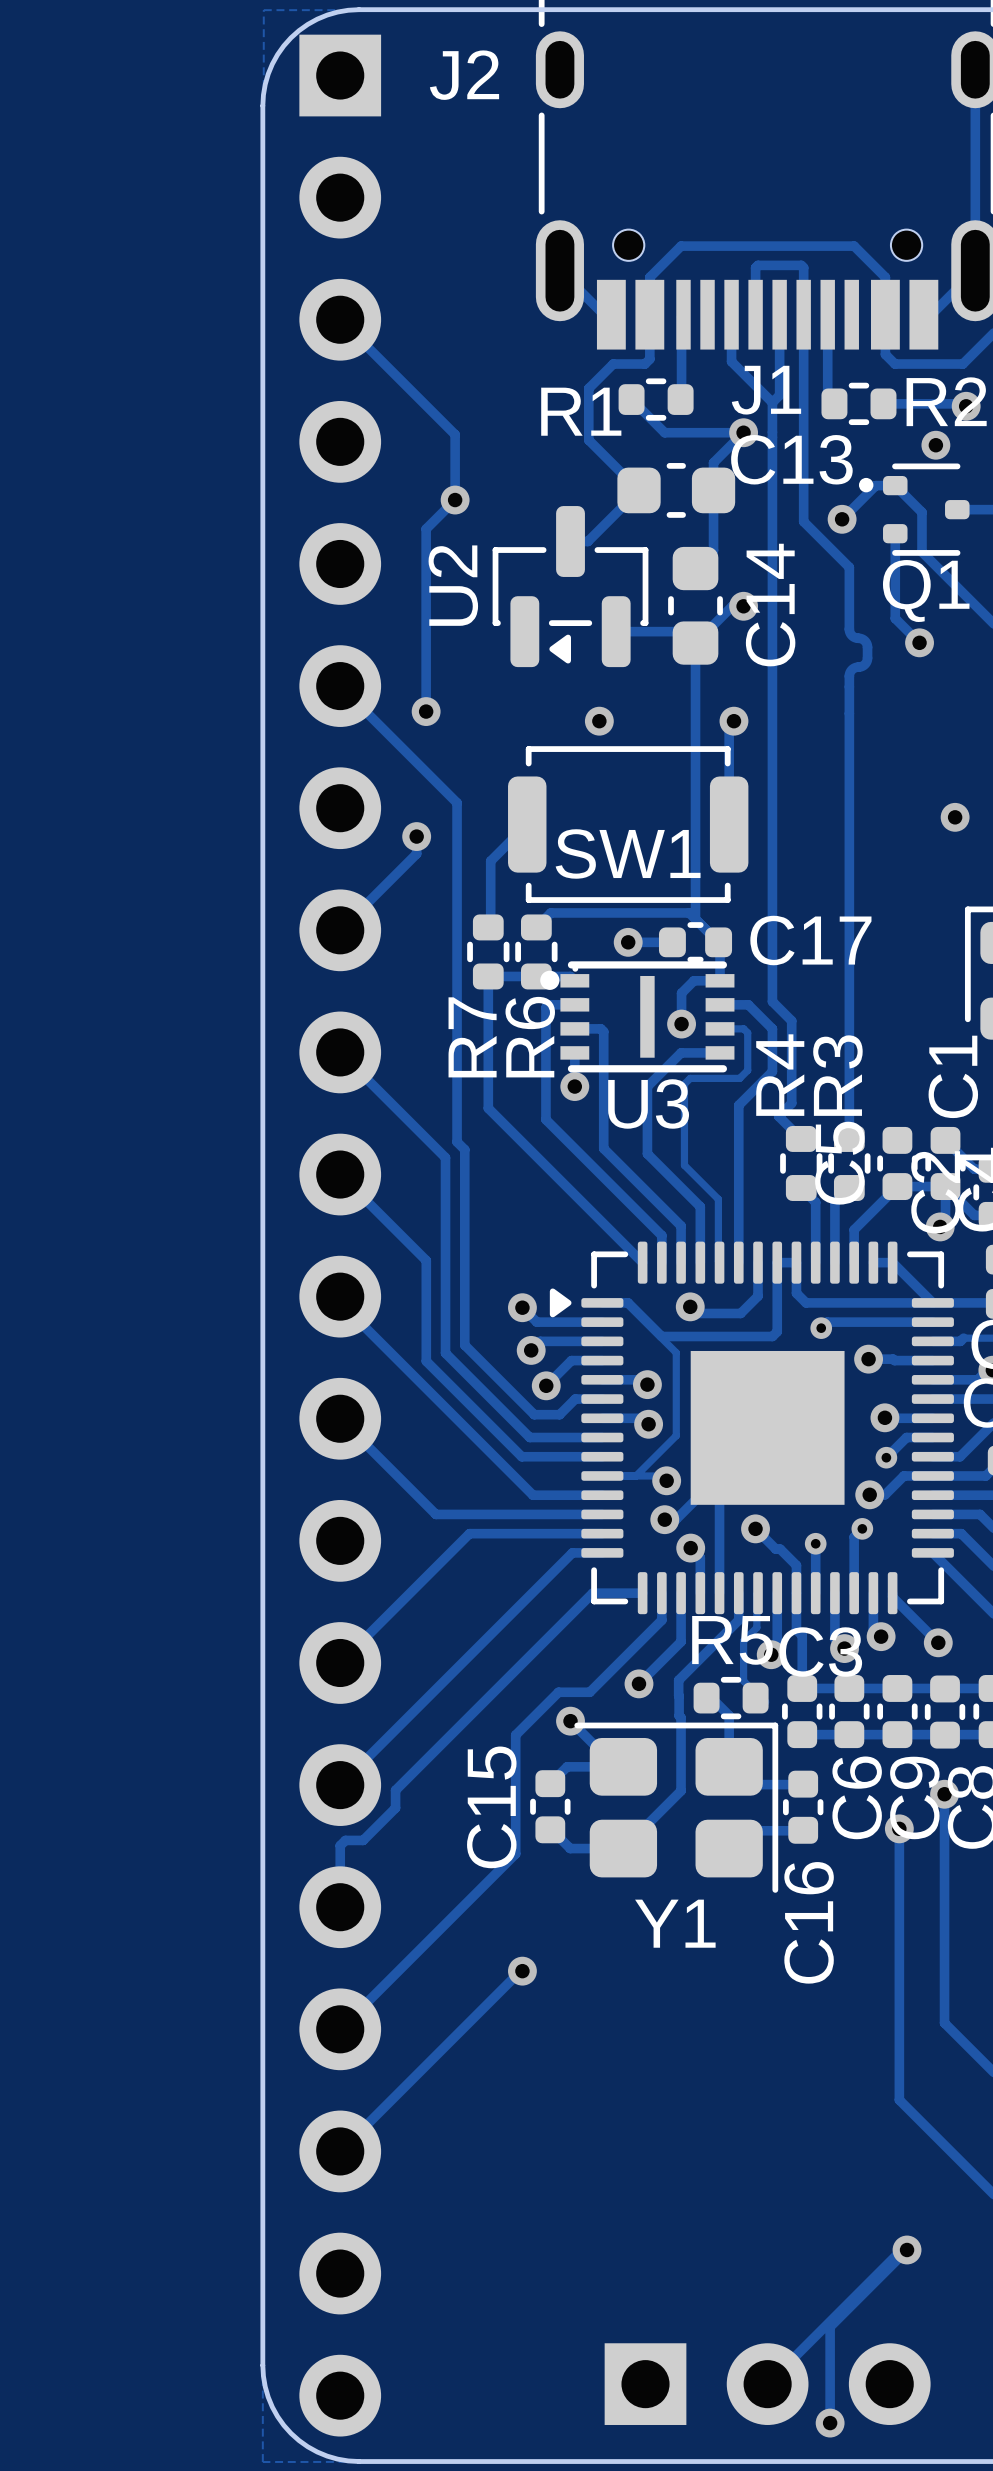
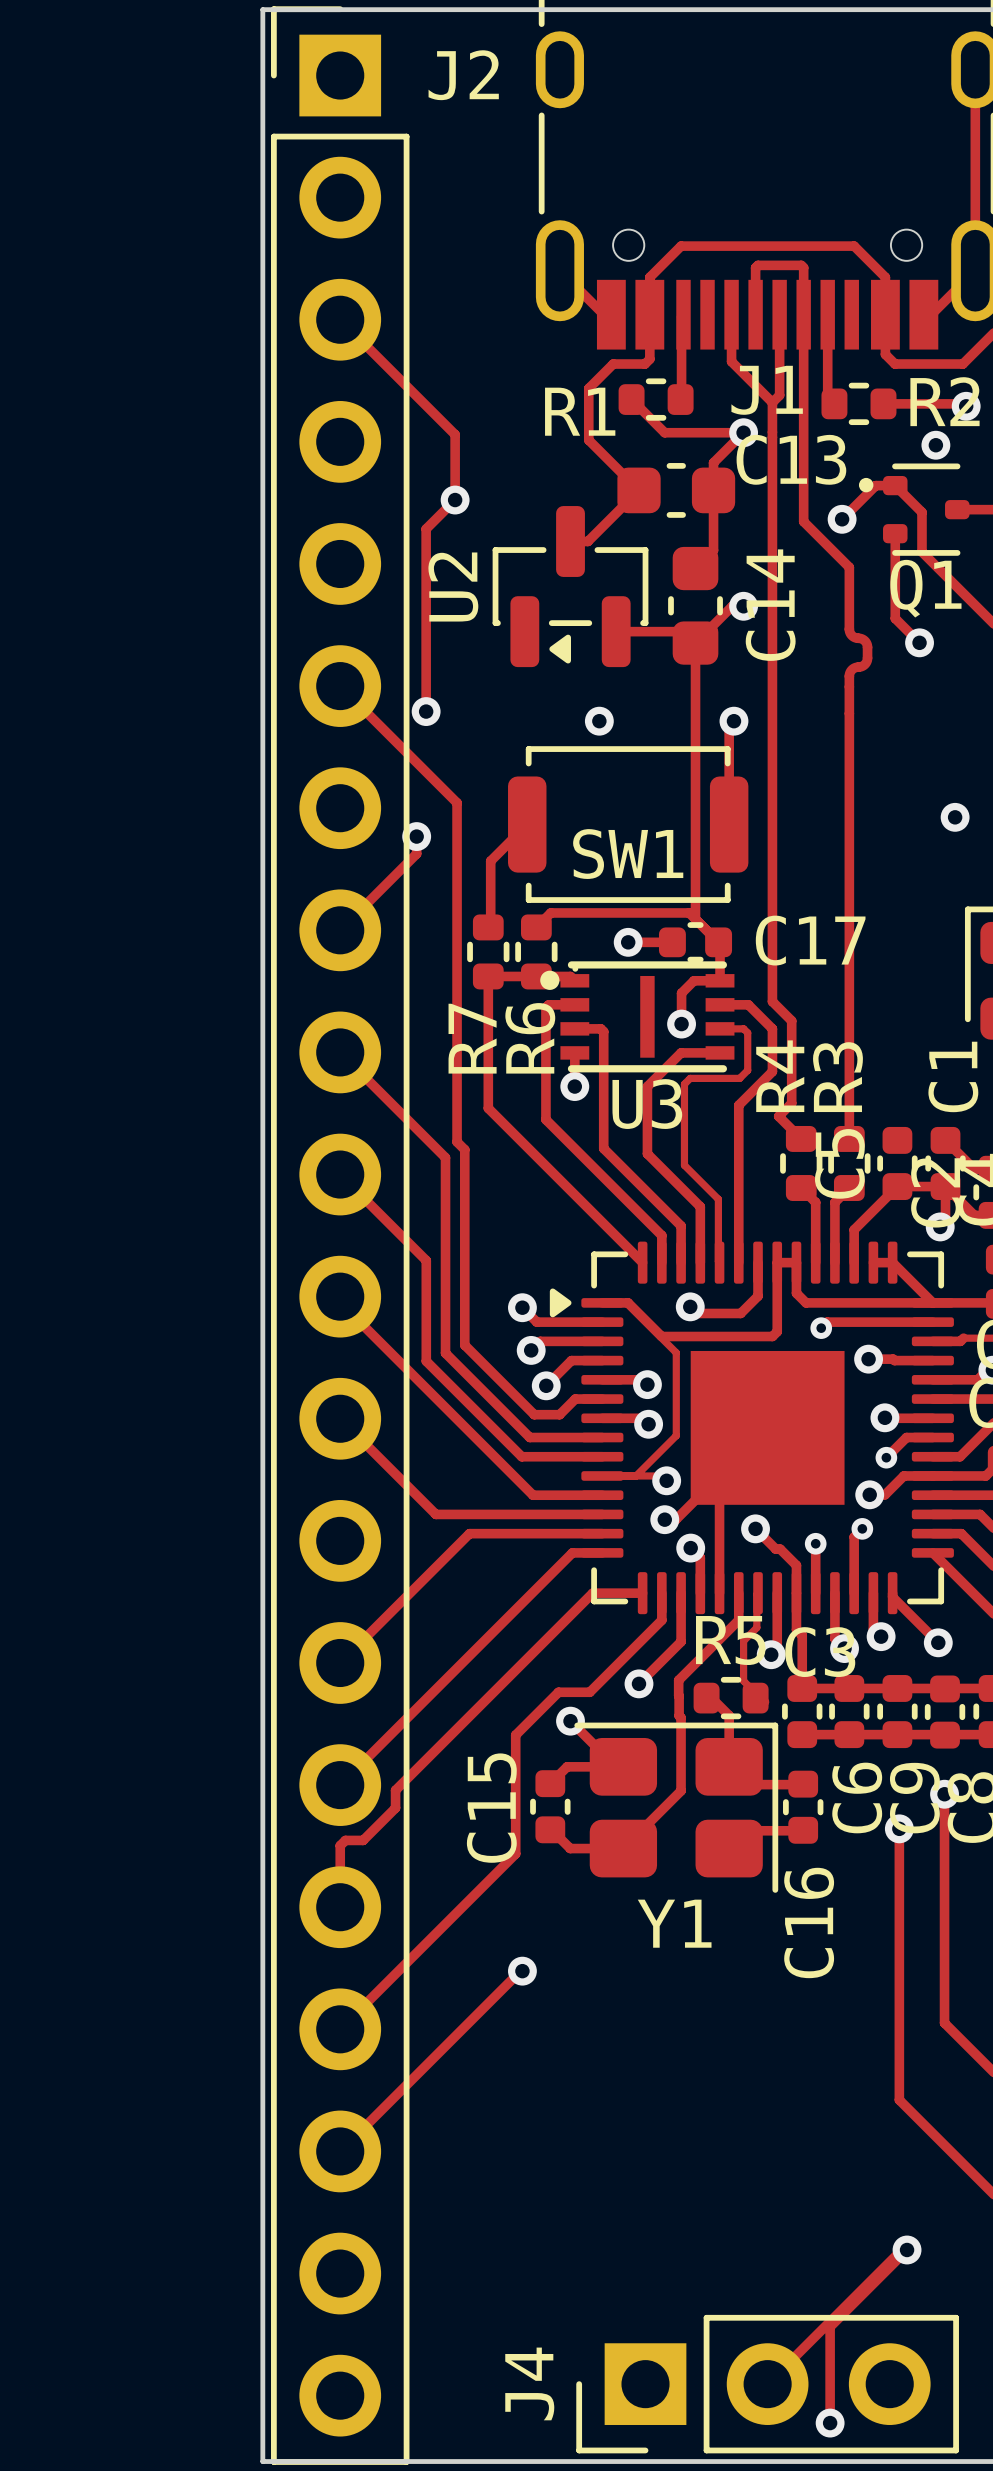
board edge: (358, 9) (327, 15) (307, 24) (290, 37) (272, 64) (265, 84) (262, 105) -> (358, 9) (262, 9) (262, 105)
J2 side: bottom (340, 1235) -> top (340, 1235)
board edge: (262, 2365) (268, 2397) (277, 2416) (290, 2433) (307, 2446) (327, 2456) (358, 2461) -> (262, 2365) (262, 2461) (358, 2461)
J4 side: bottom (767, 2384) -> top (767, 2384)

